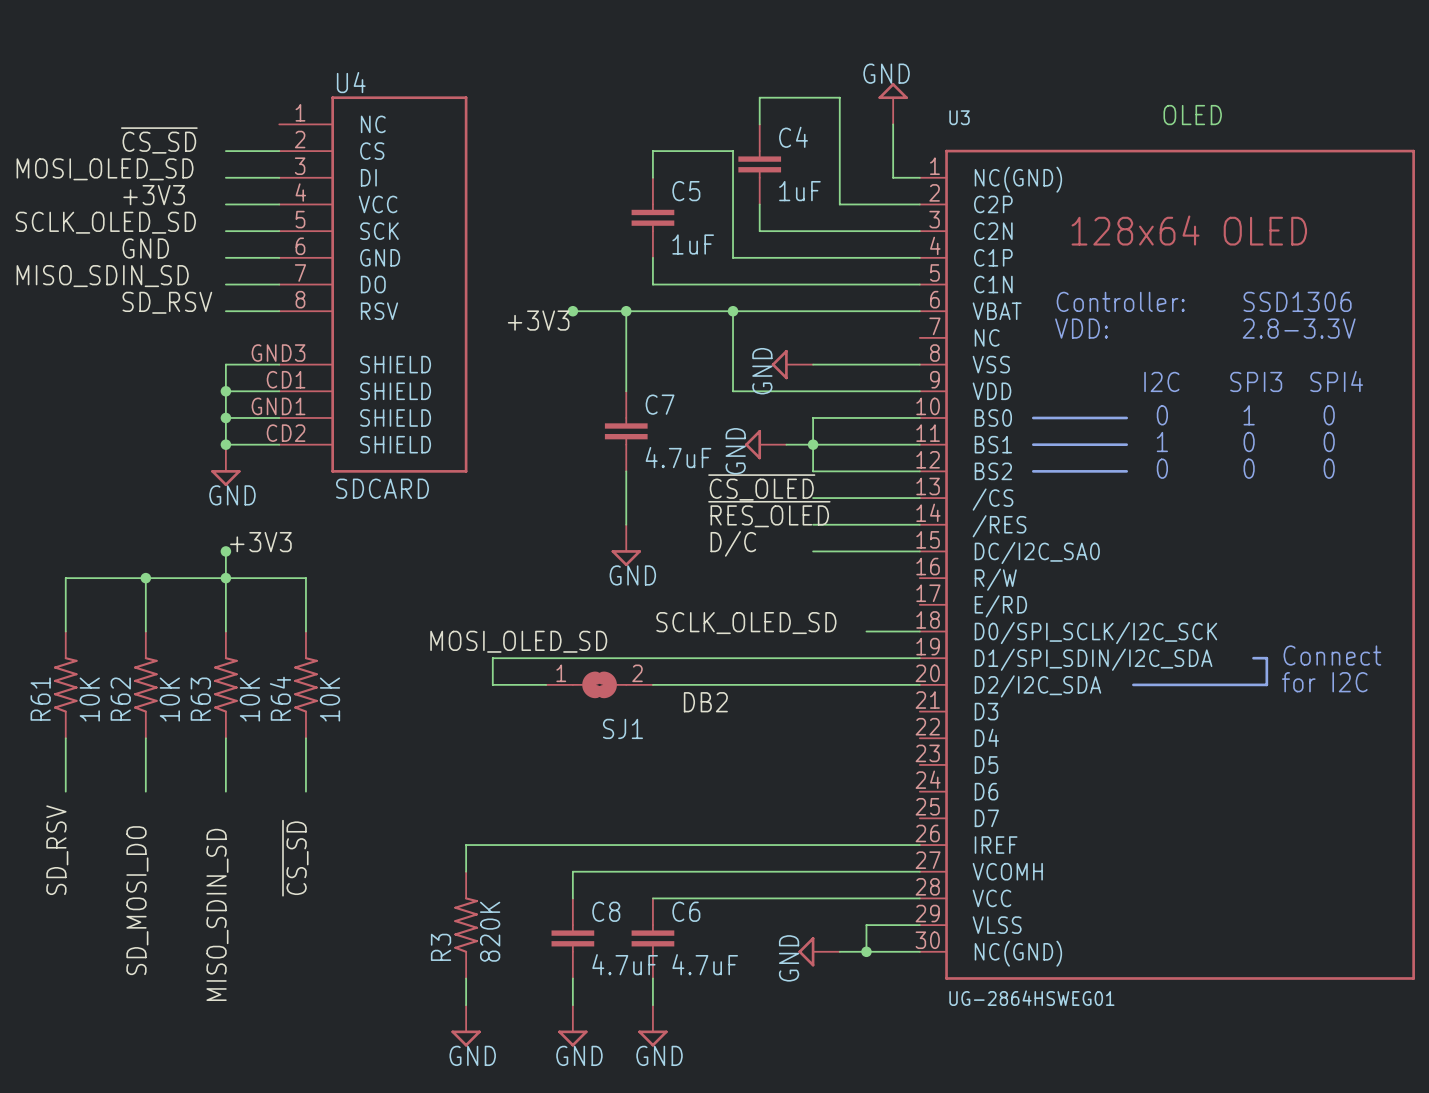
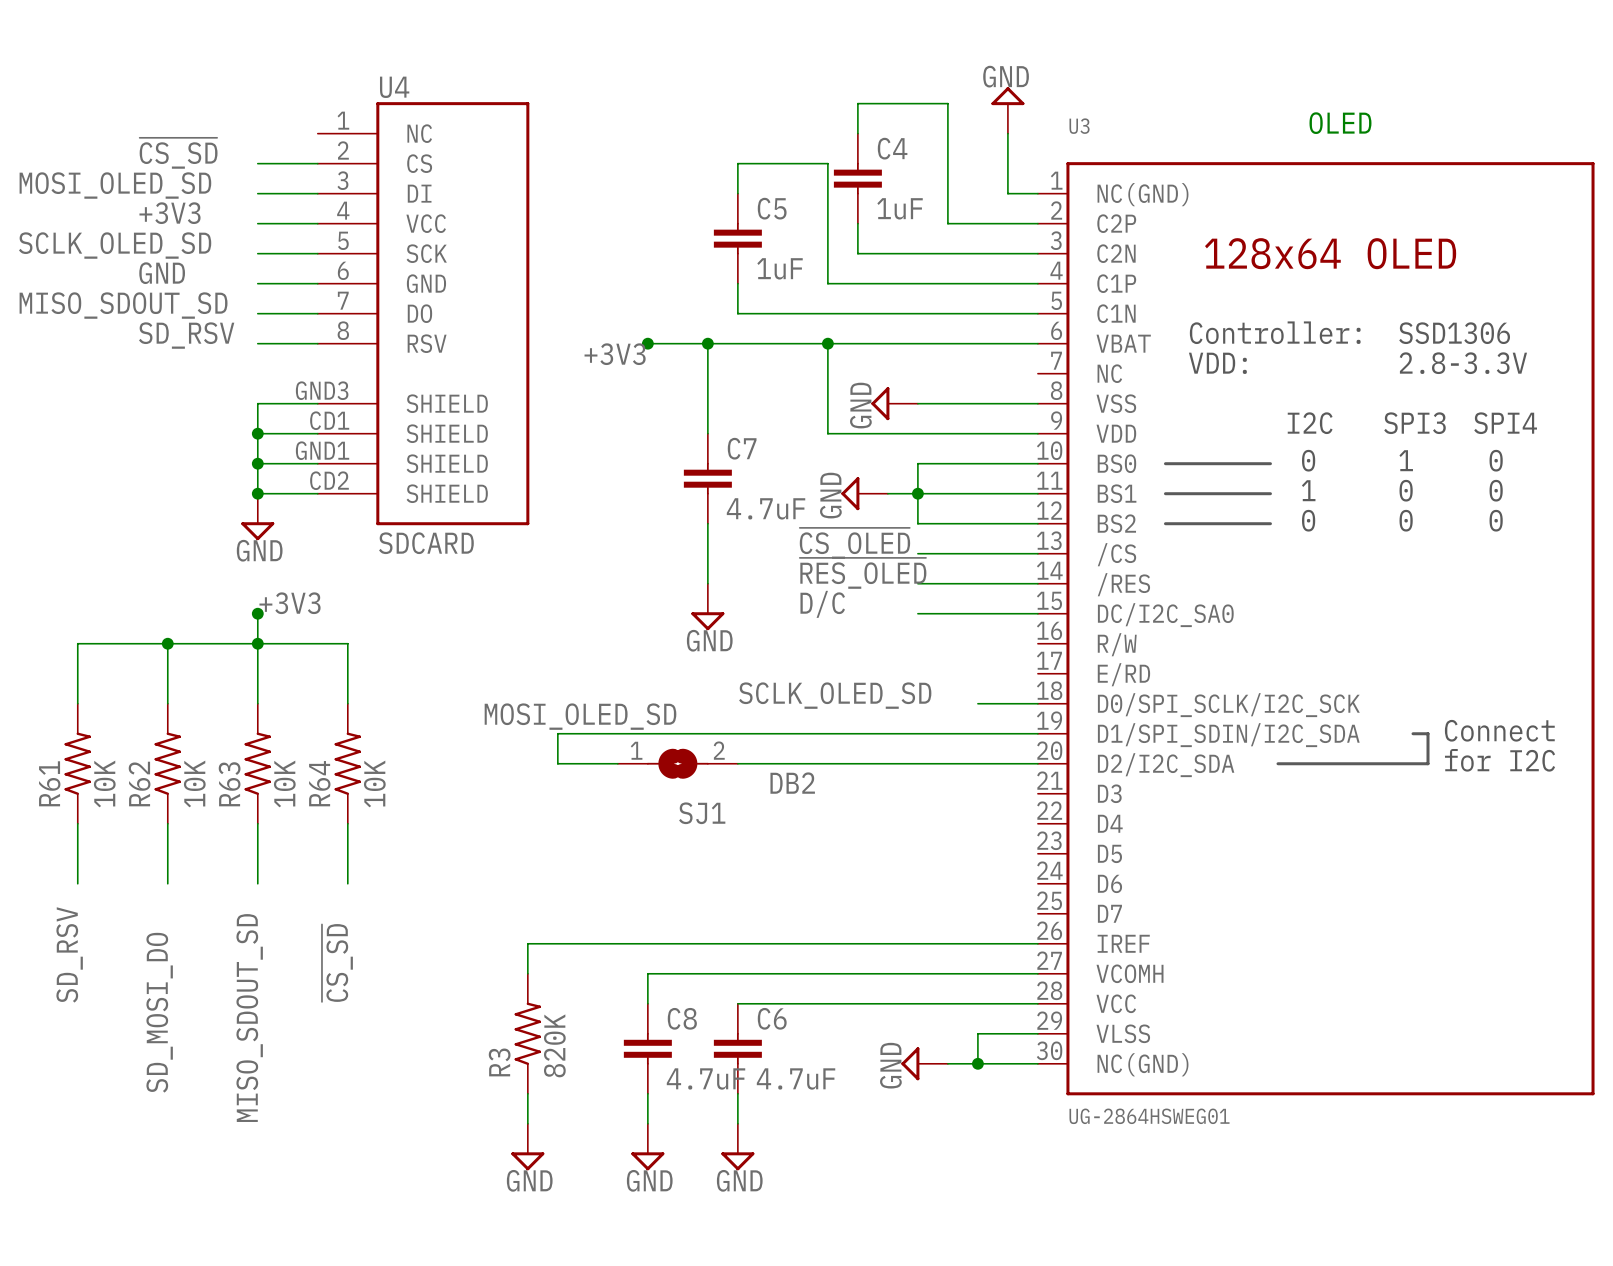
label: MISO_SDIN_SD (102, 276) -> MISO_SDOUT_SD (123, 305)
label: MISO_SDIN_SD (217, 914) -> MISO_SDOUT_SD (249, 1018)

